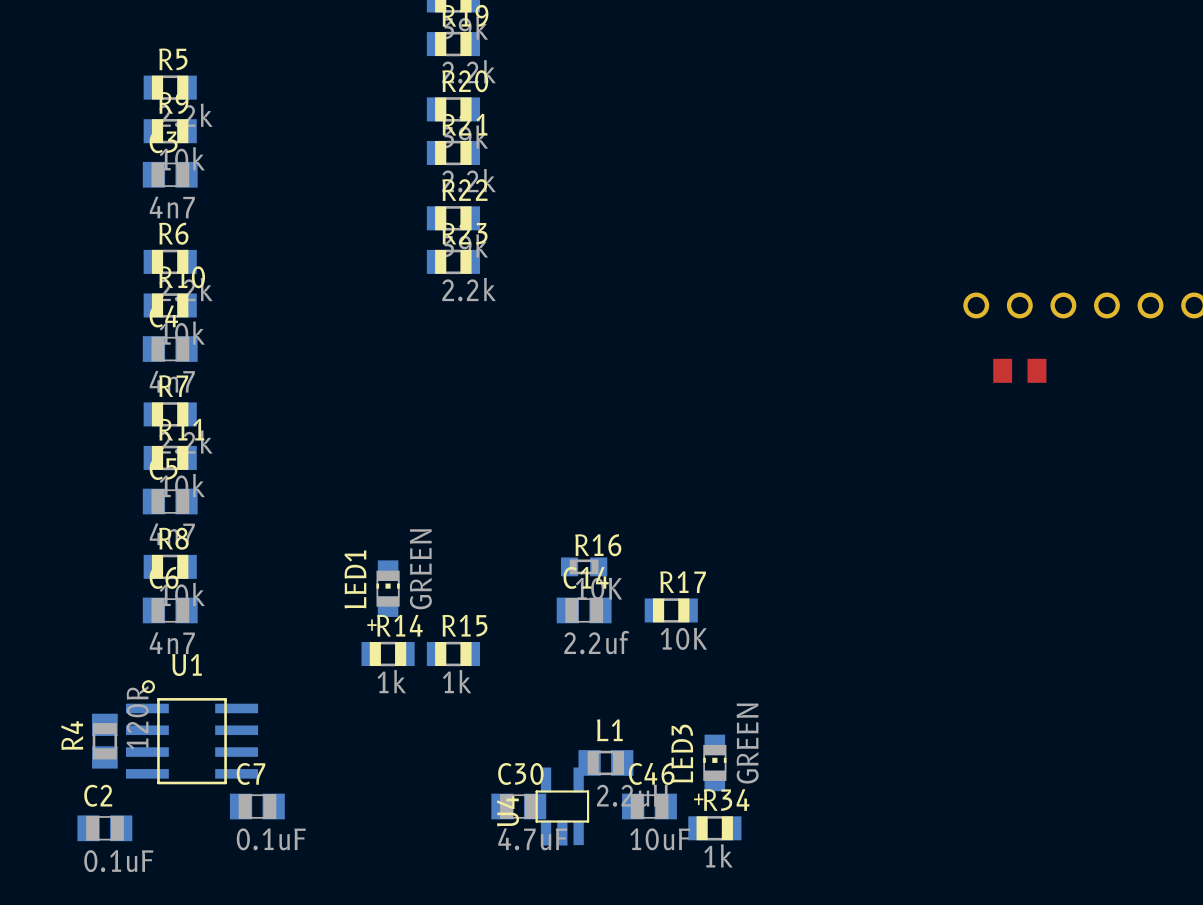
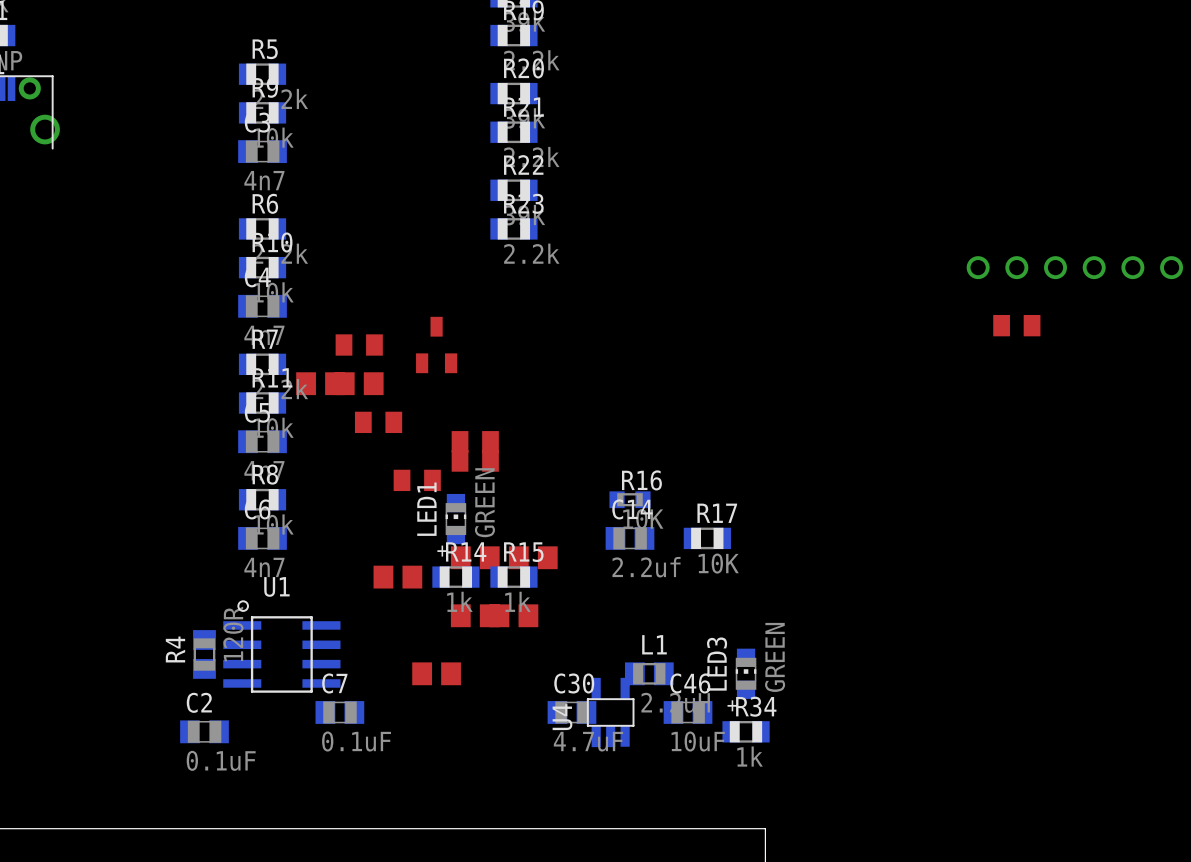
part: none -> (359, 345)
part: none -> (436, 345)
part: none -> (320, 383)
part: none -> (359, 383)
part: none -> (378, 422)
part: none -> (475, 441)
part: none -> (475, 461)
part: none -> (417, 480)
part: none -> (475, 557)
part: none -> (533, 557)
part: none -> (397, 577)
part: none -> (475, 615)
part: none -> (513, 615)
part: none -> (436, 673)

